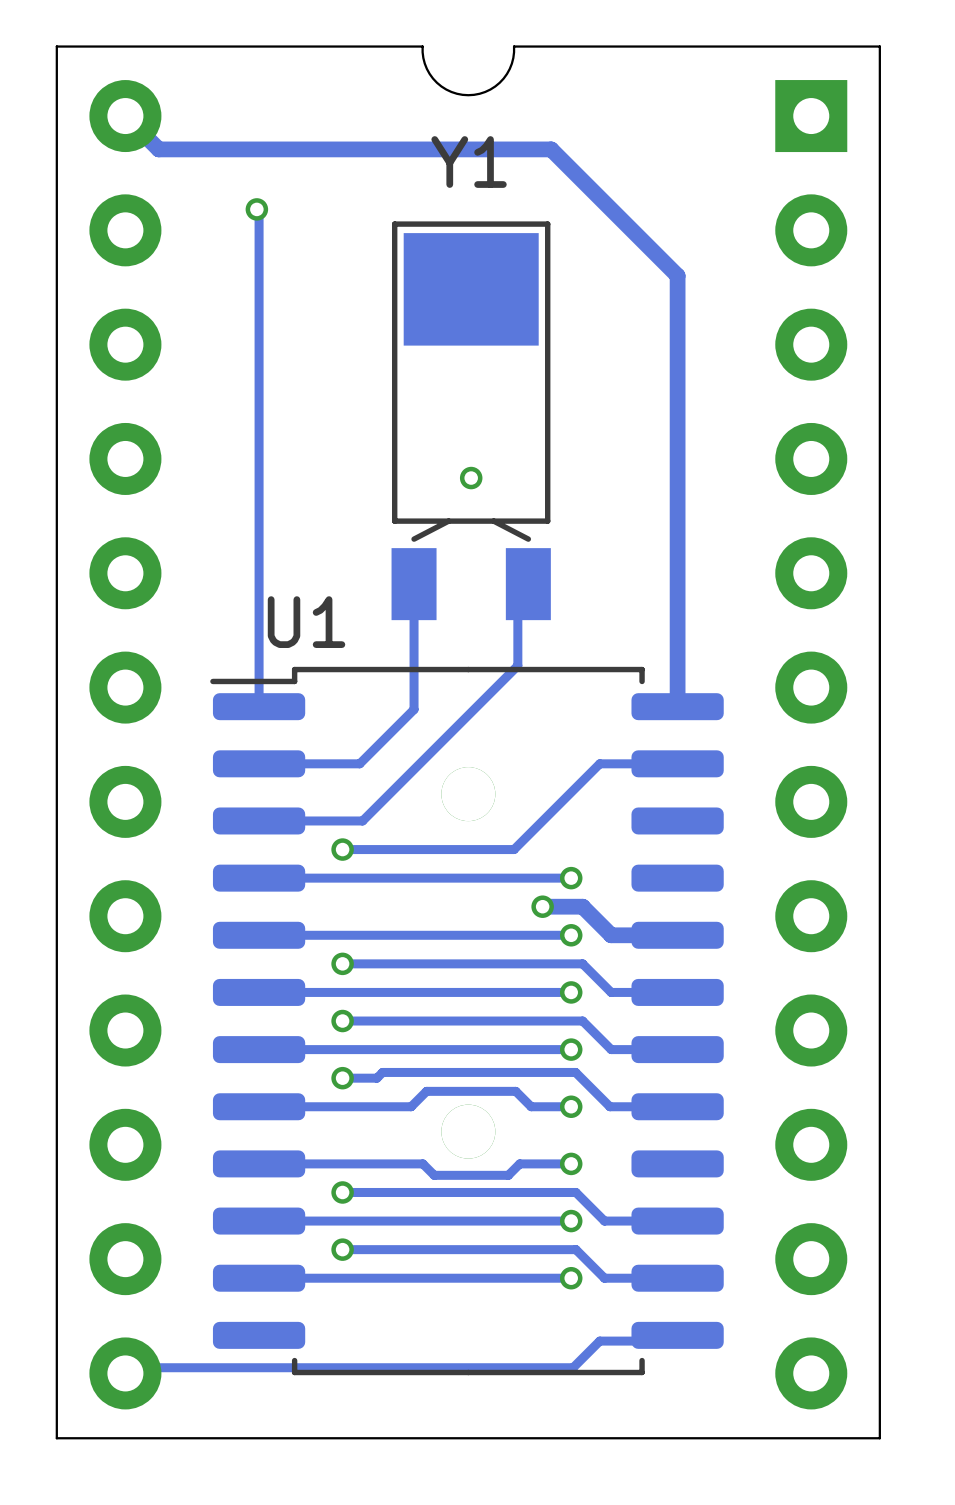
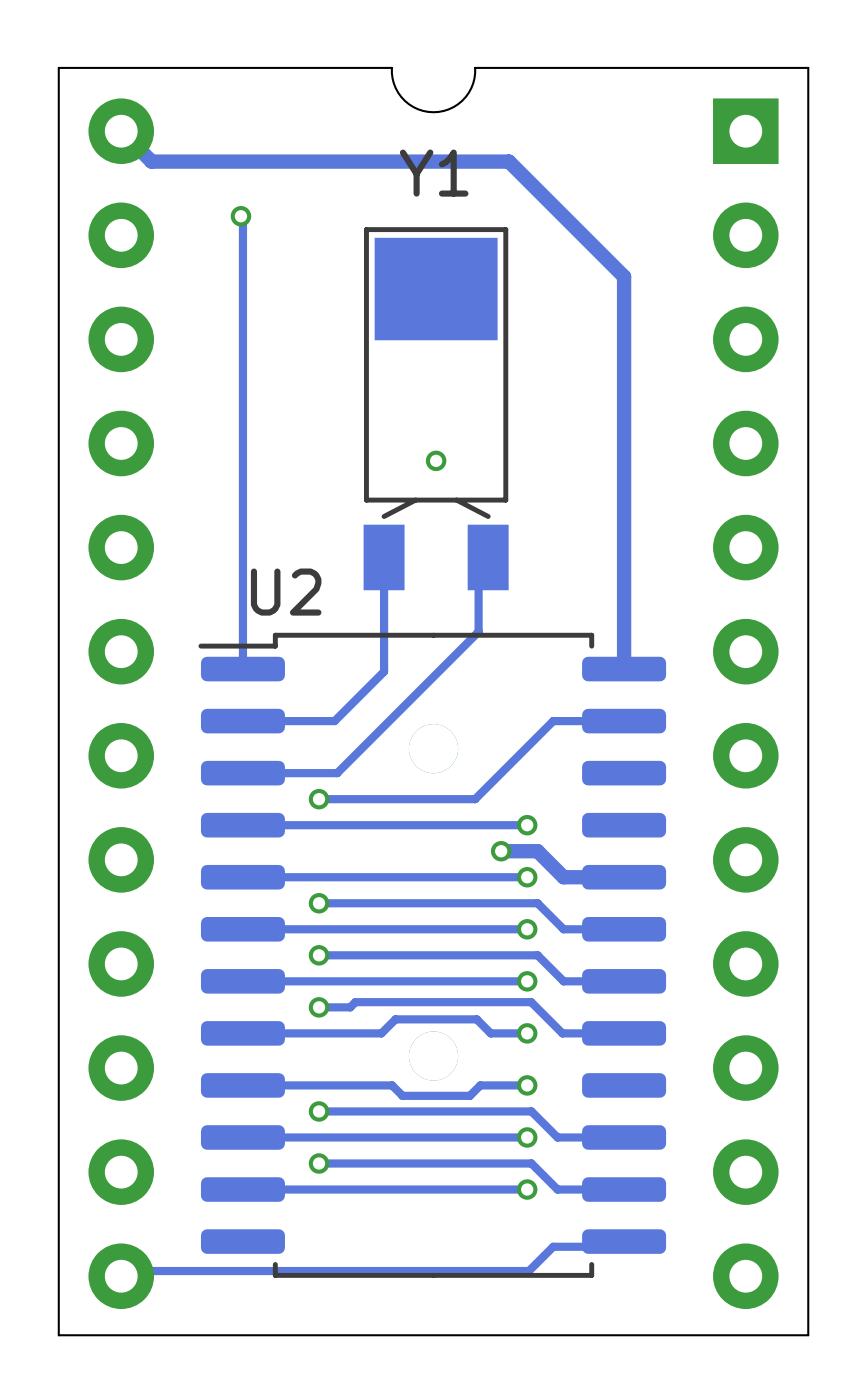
U1 name: U1 (306, 622) -> U2 (286, 592)

